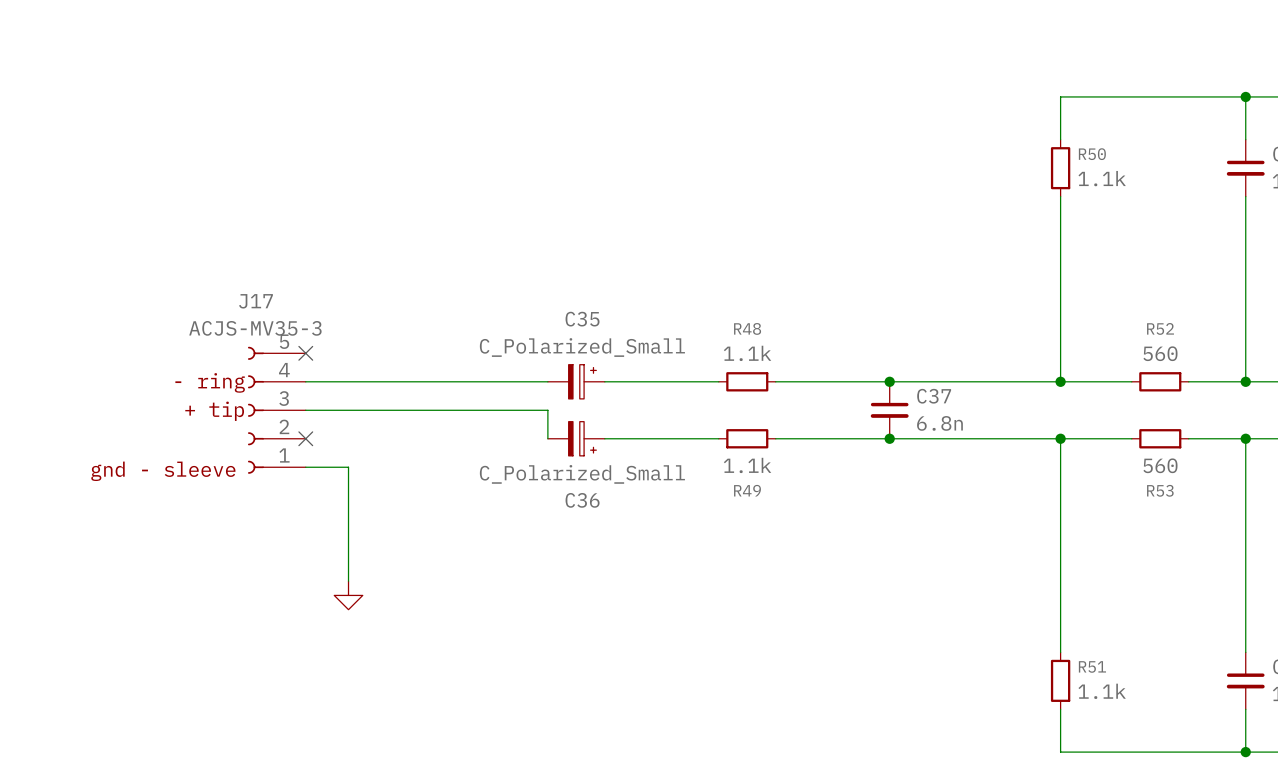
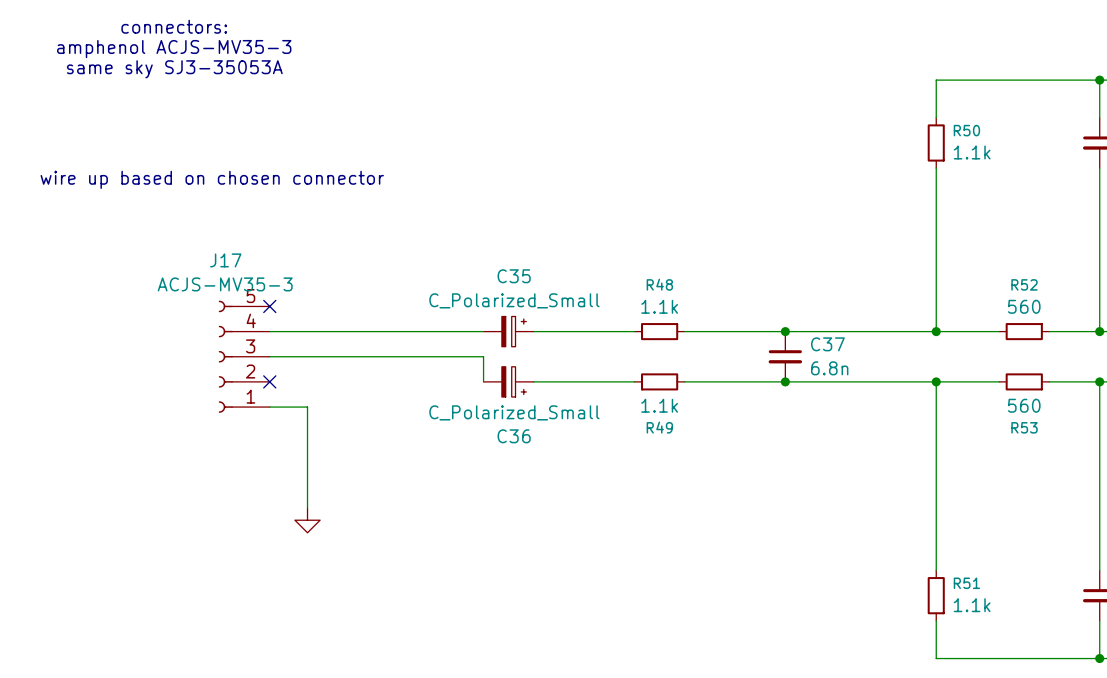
text: none -> connectors: (174, 26)
text: none -> amphenol ACJS-MV35-3 (174, 49)
text: none -> same sky SJ3-35053A (174, 69)
text: none -> wire up based on chosen connector (212, 179)
J17 text: - ring (210, 382) -> none
J17 text: + tip (214, 411) -> none
J17 text: gnd - sleeve (163, 471) -> none

